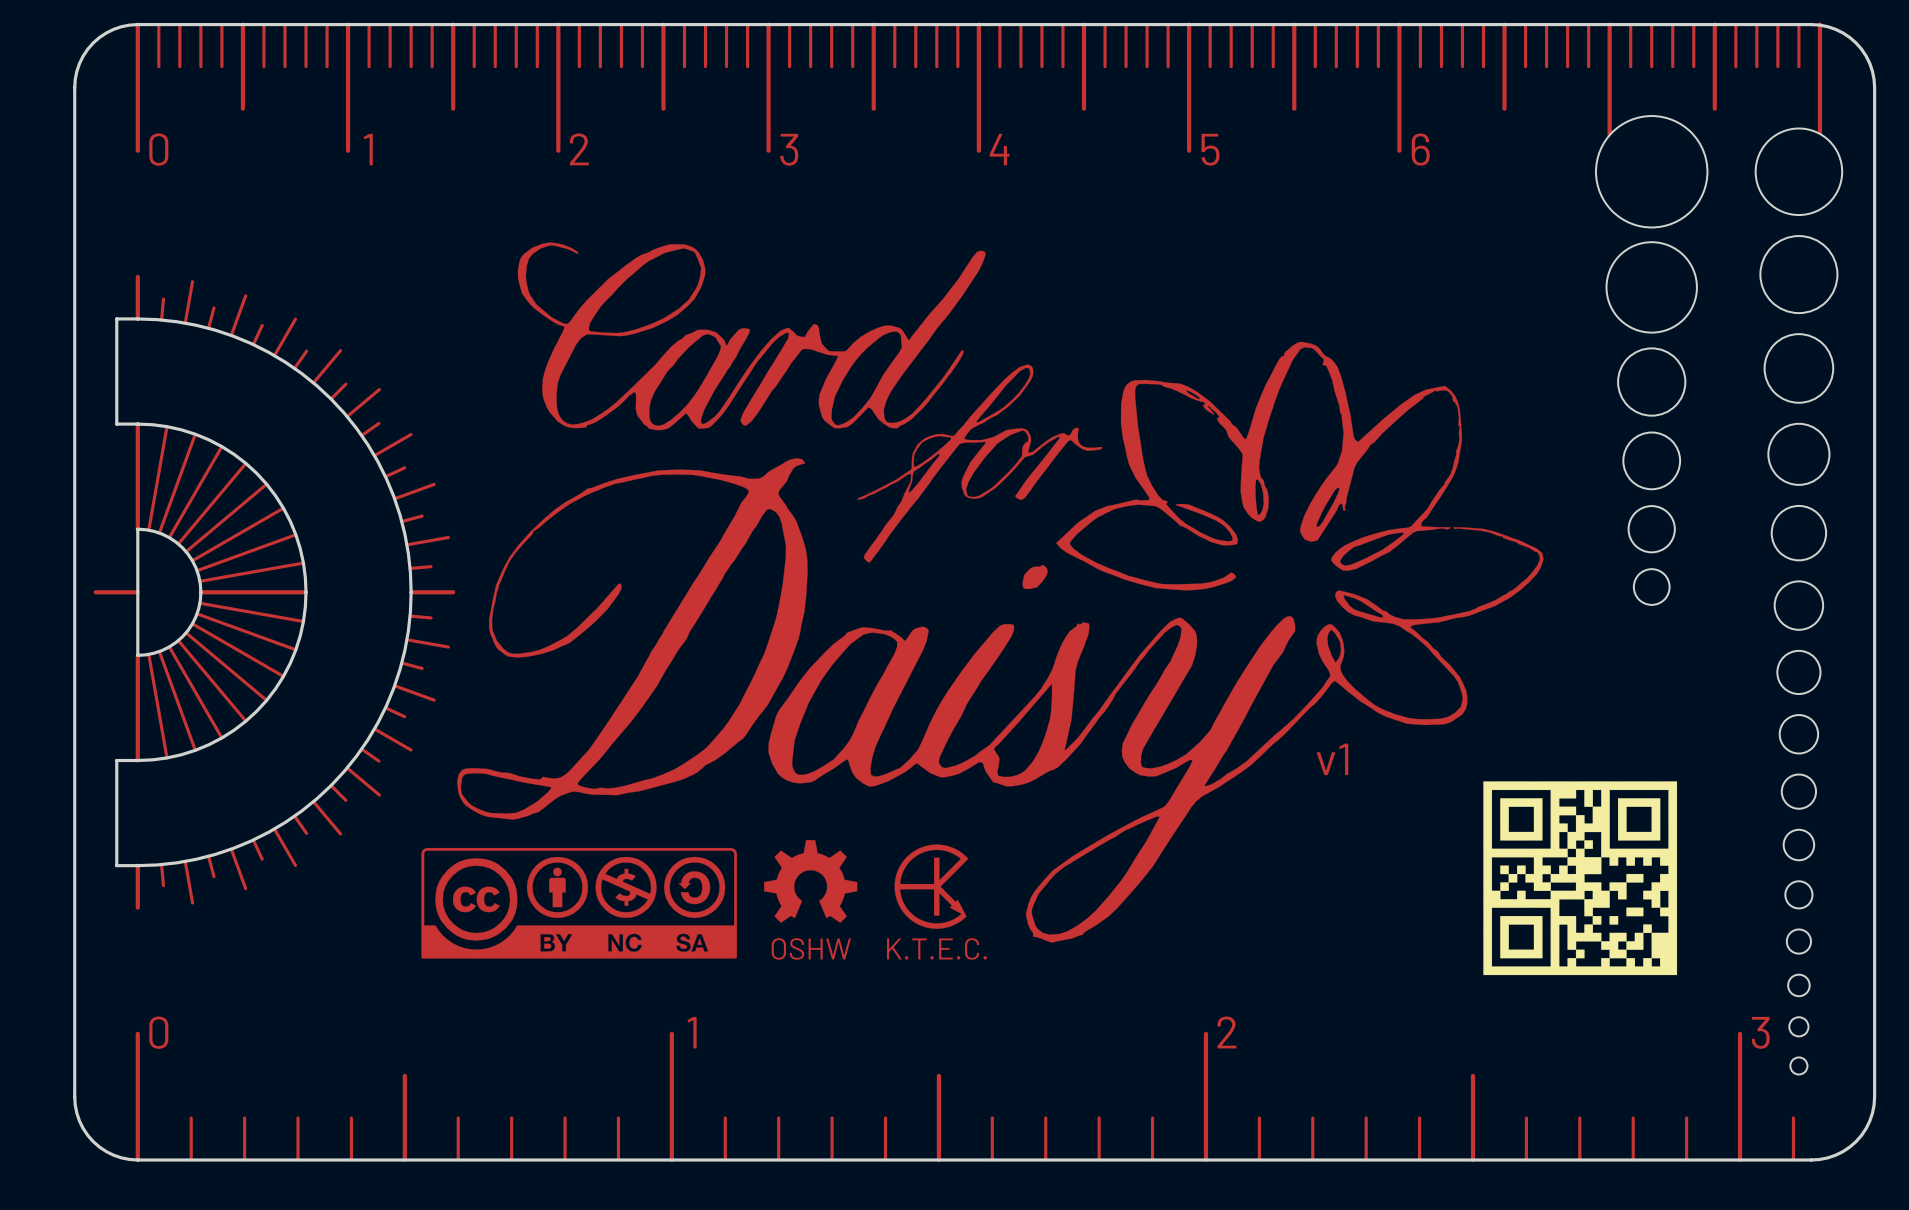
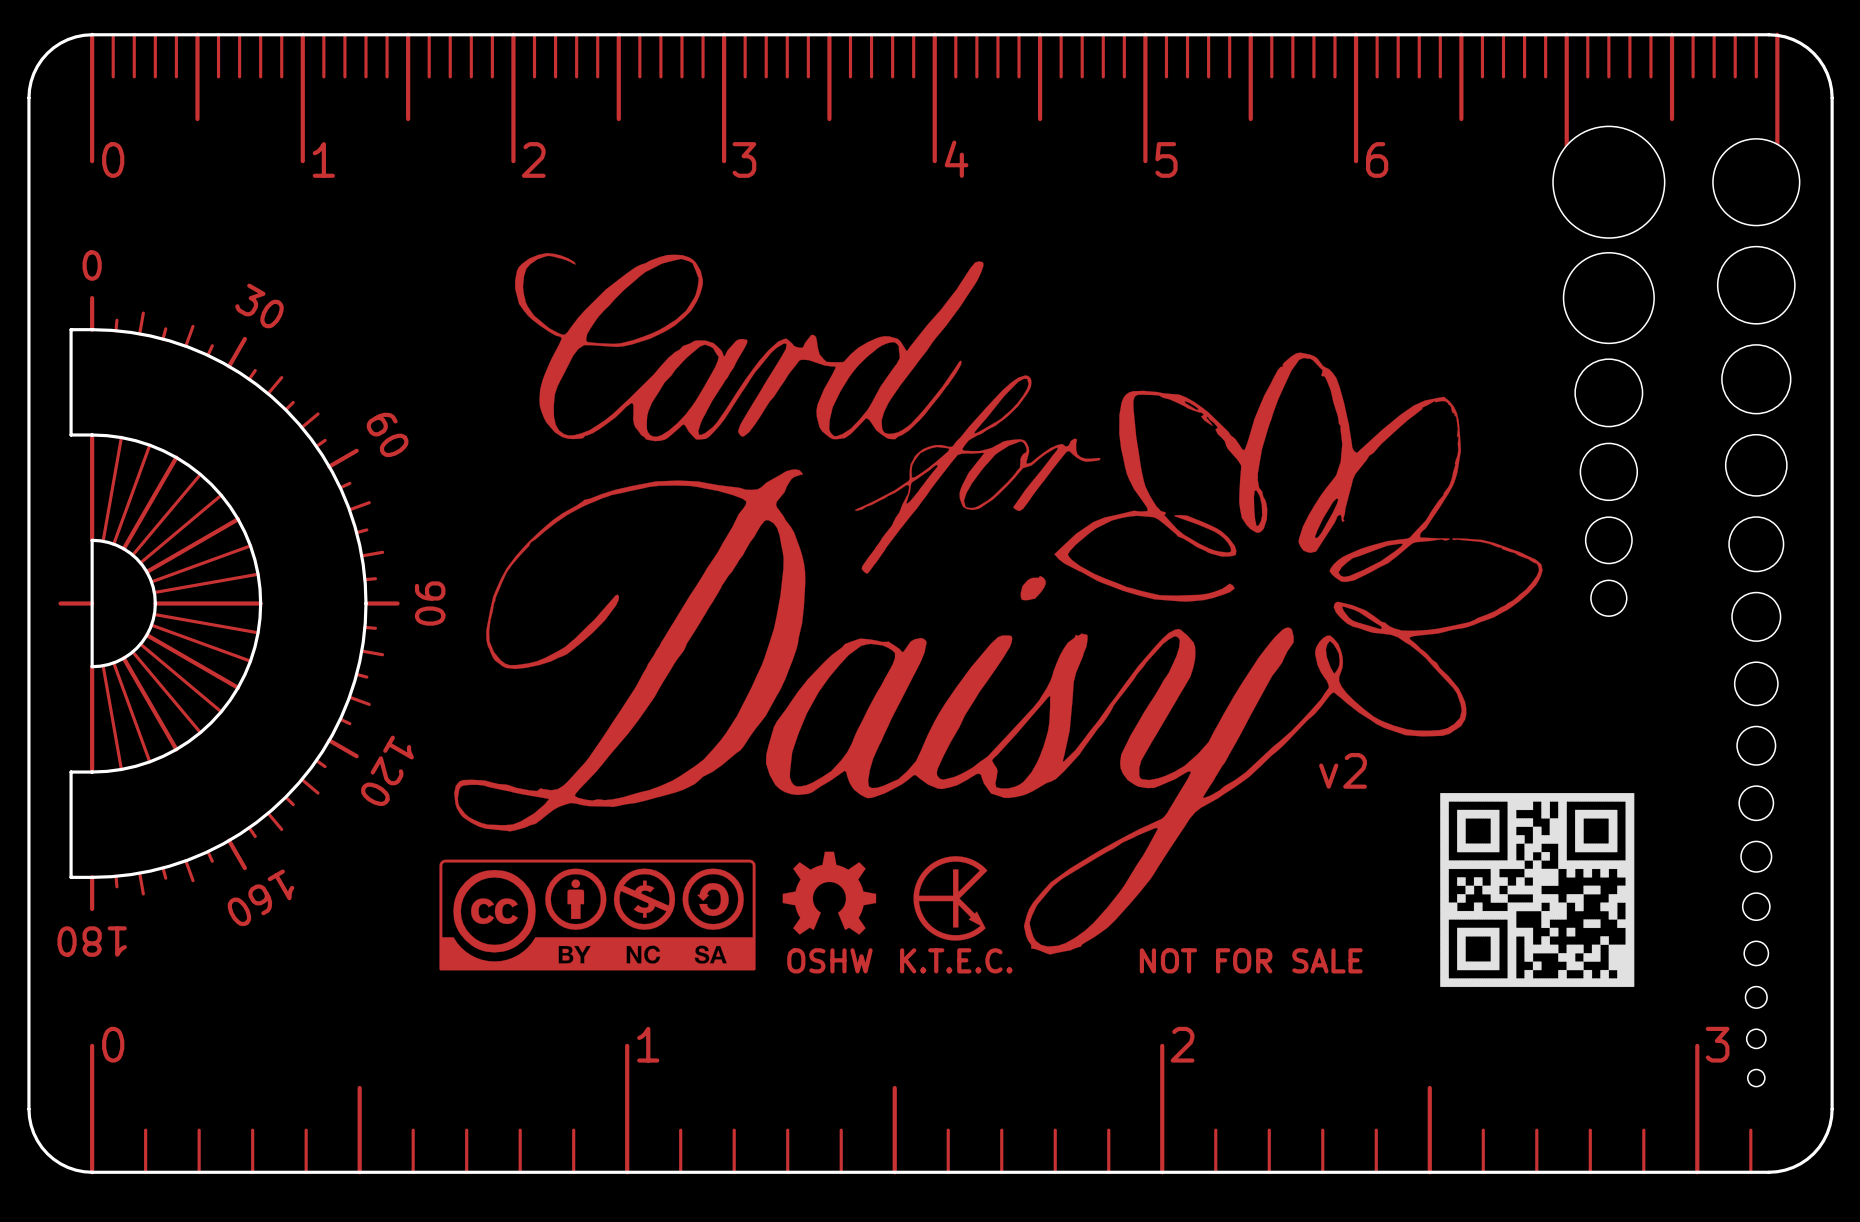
text: none -> 0 (92, 265)
drawing shape: [93, 274, 456, 910] -> [58, 295, 400, 912]
text: none -> 30 (259, 305)
text: none -> 60 (387, 434)
text: none -> 90 (430, 603)
drawing position: (1000, 592) -> (998, 603)
text: v1 (1332, 759) -> none
text: none -> v2 (1343, 770)
text: none -> 120 (387, 770)
drawing position: (810, 881) -> (829, 893)
drawing position: (931, 886) -> (950, 898)
text: none -> 160 (260, 897)
drawing position: (579, 903) -> (597, 915)
text: none -> 180 (92, 941)
text position: OSHW (811, 948) -> OSHW (829, 960)
text position: K.T.E.C. (936, 948) -> K.T.E.C. (956, 960)
text: none -> NOT FOR SALE (1251, 960)

